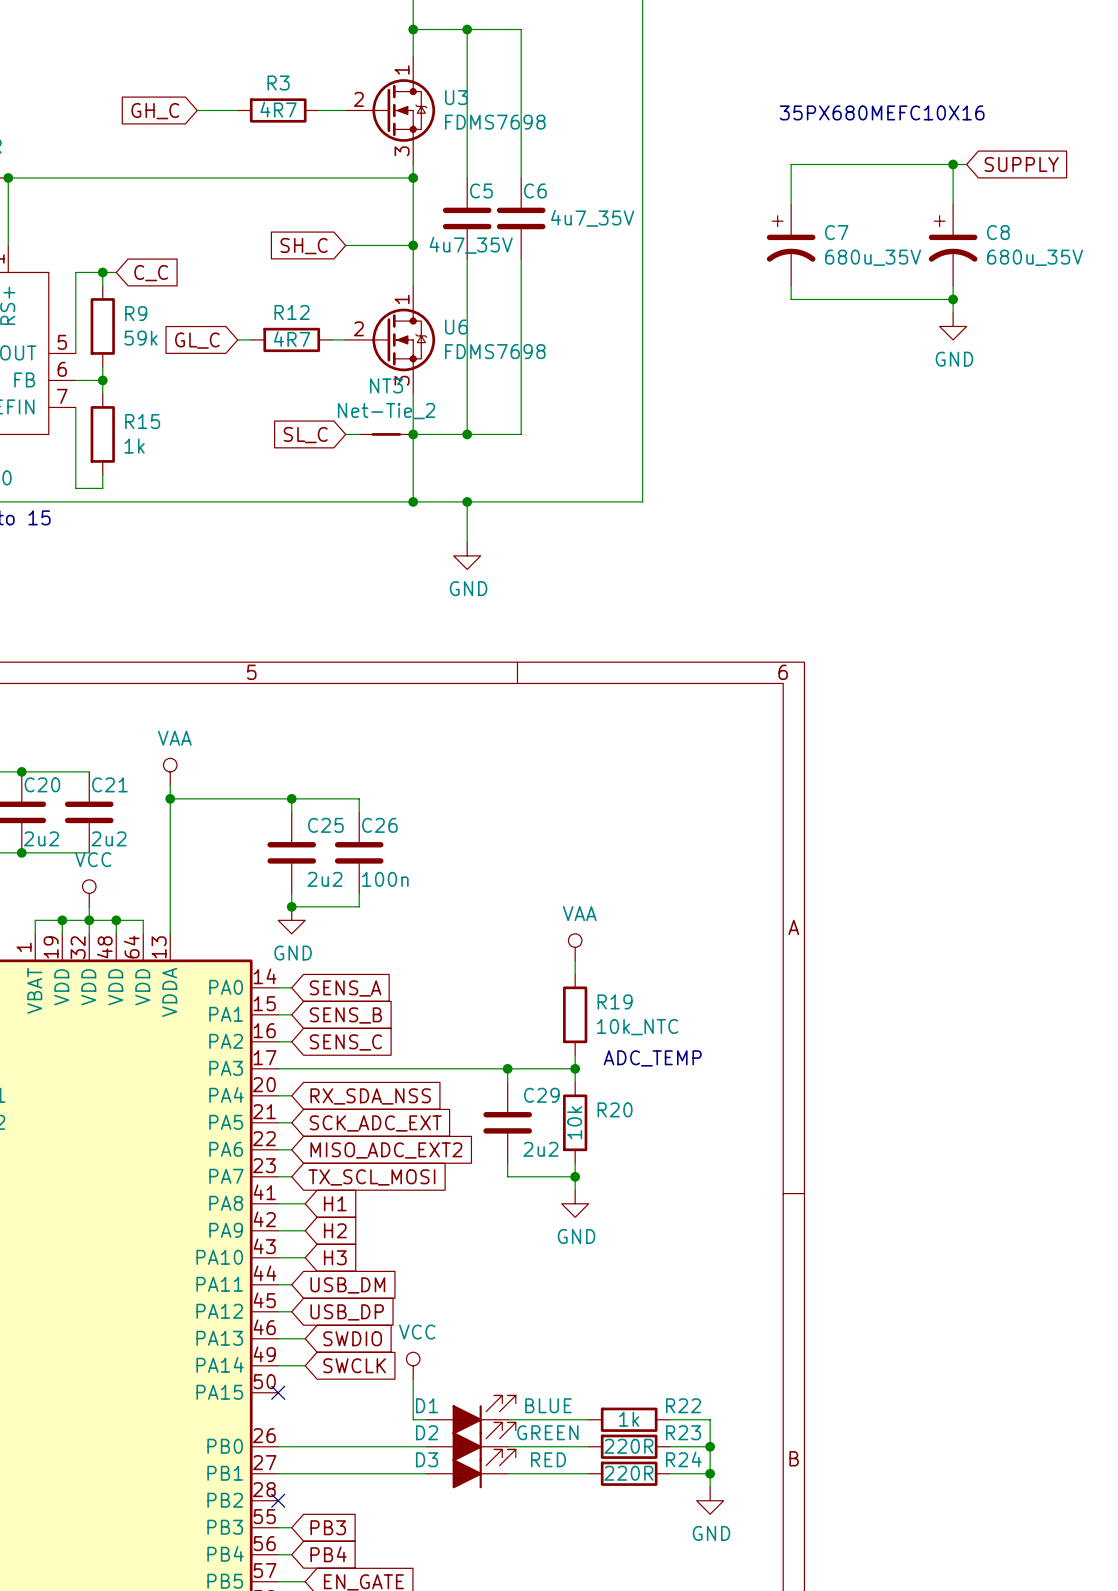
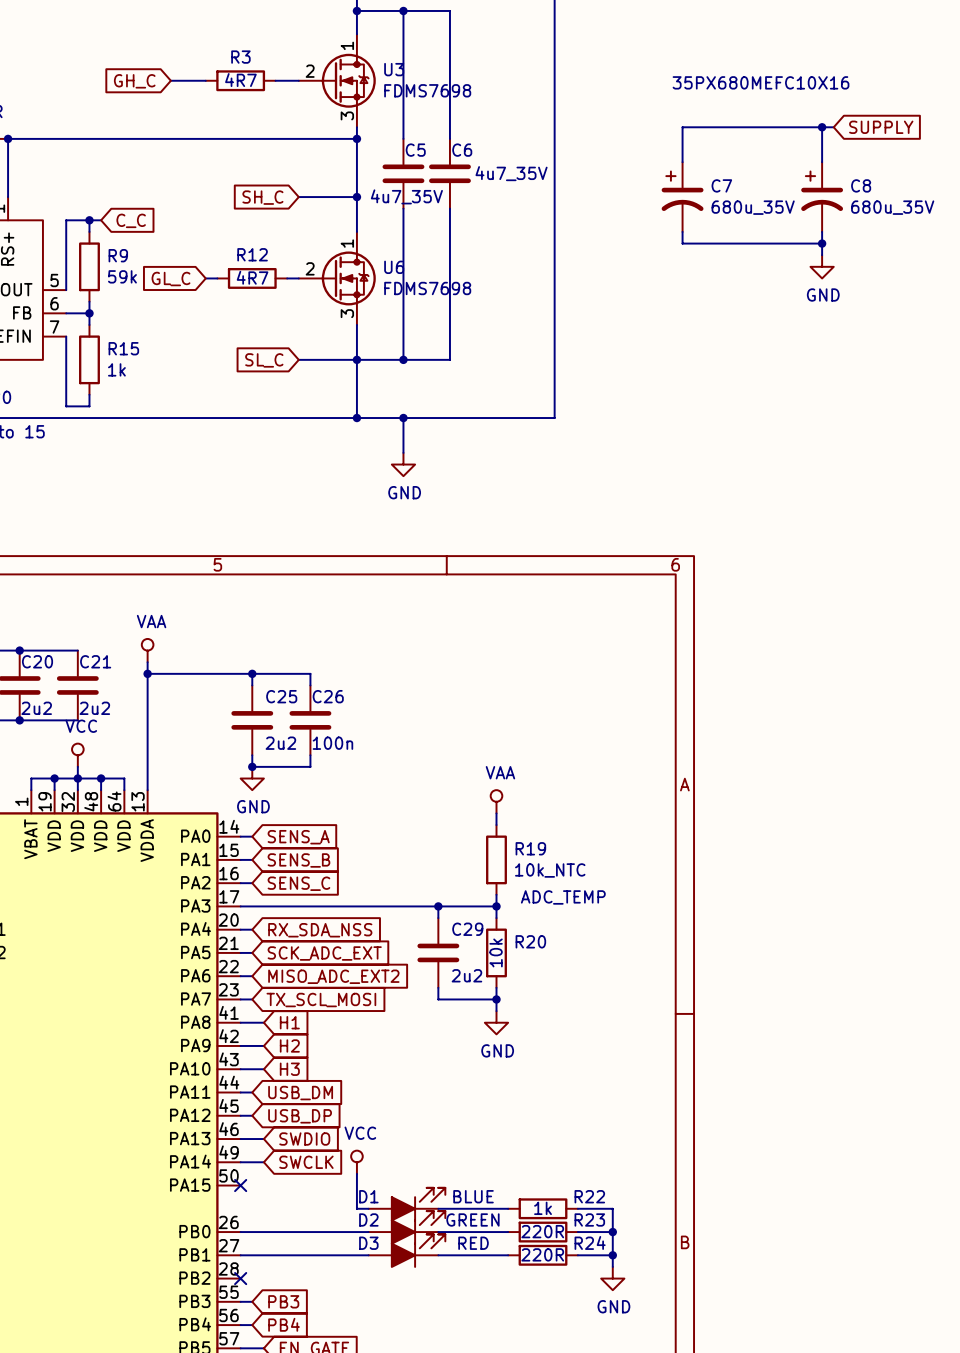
NT3: Net-Tie_2 (386, 434) -> none

